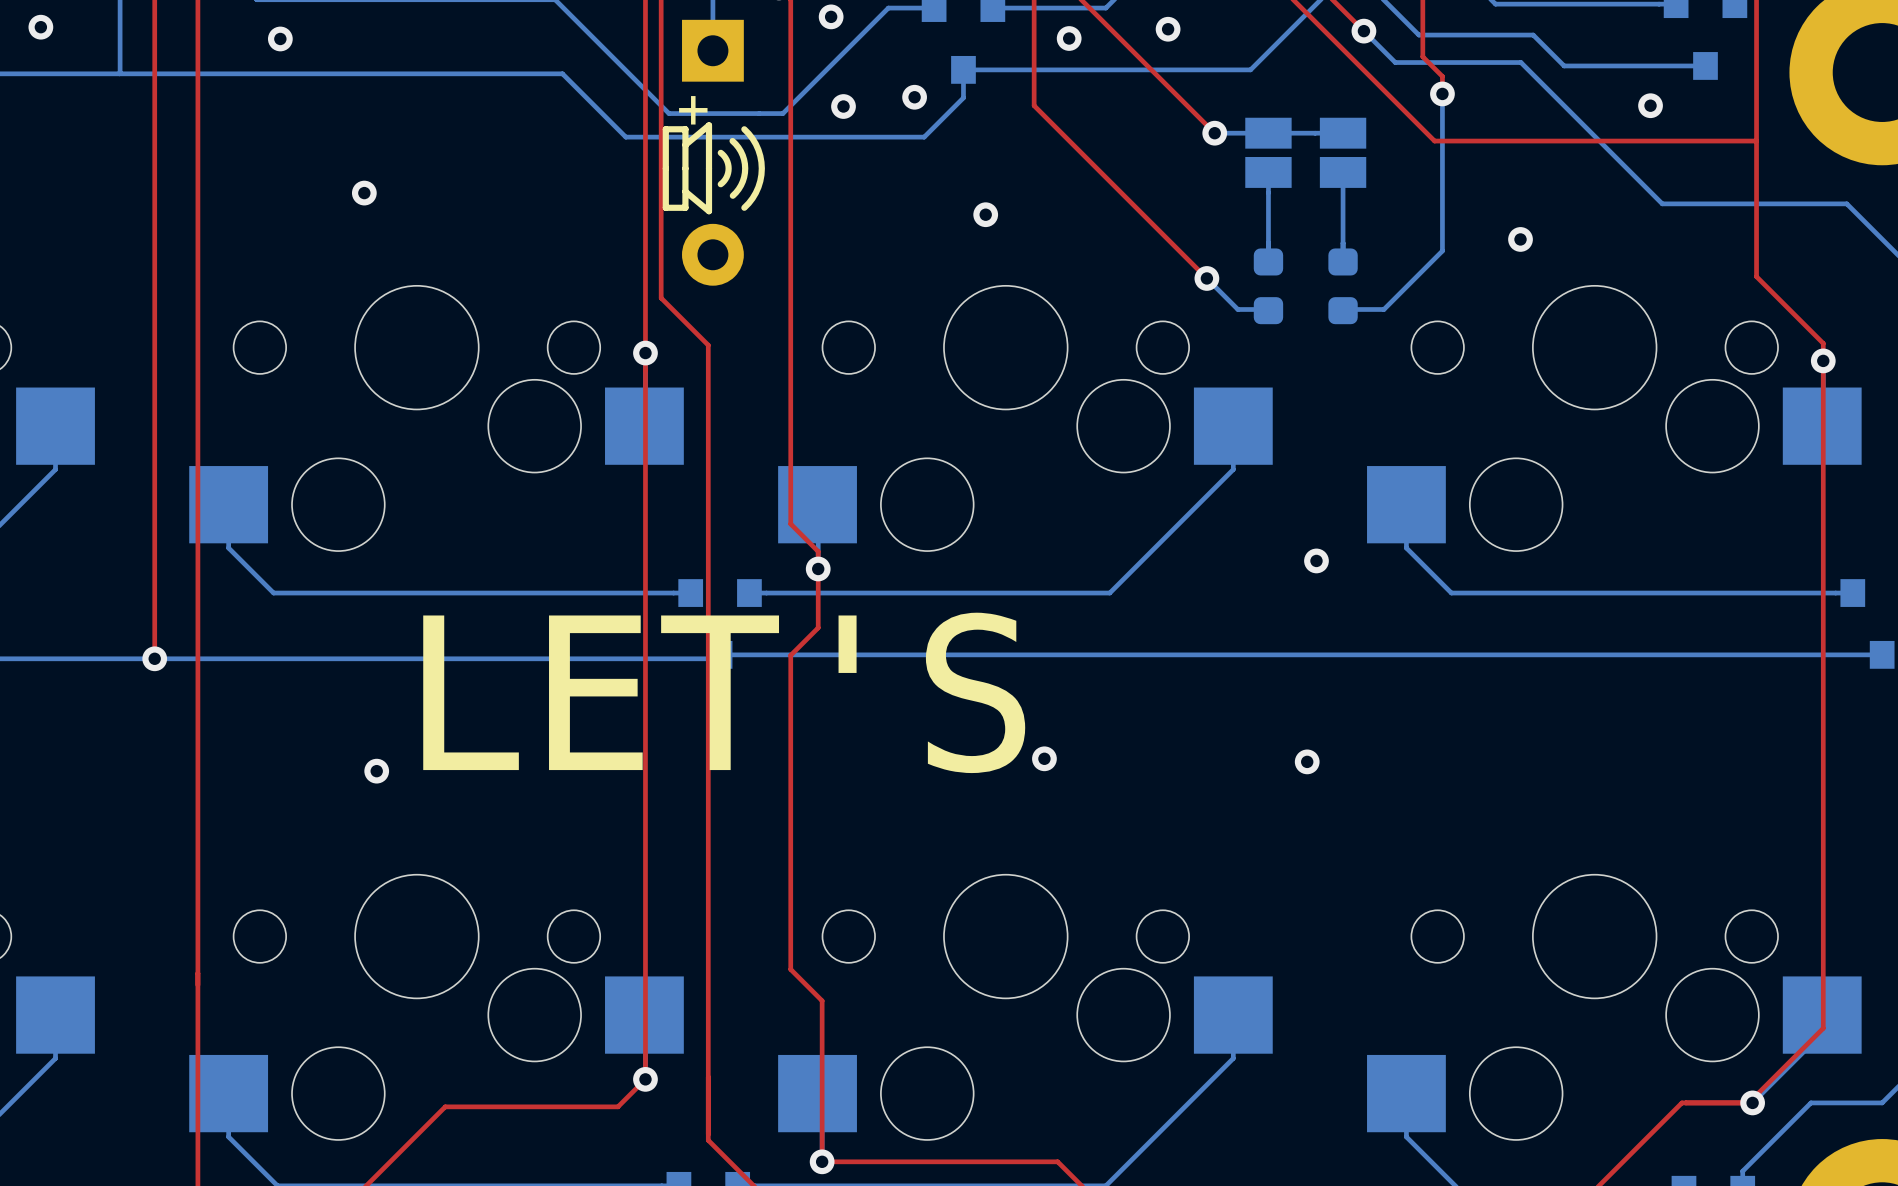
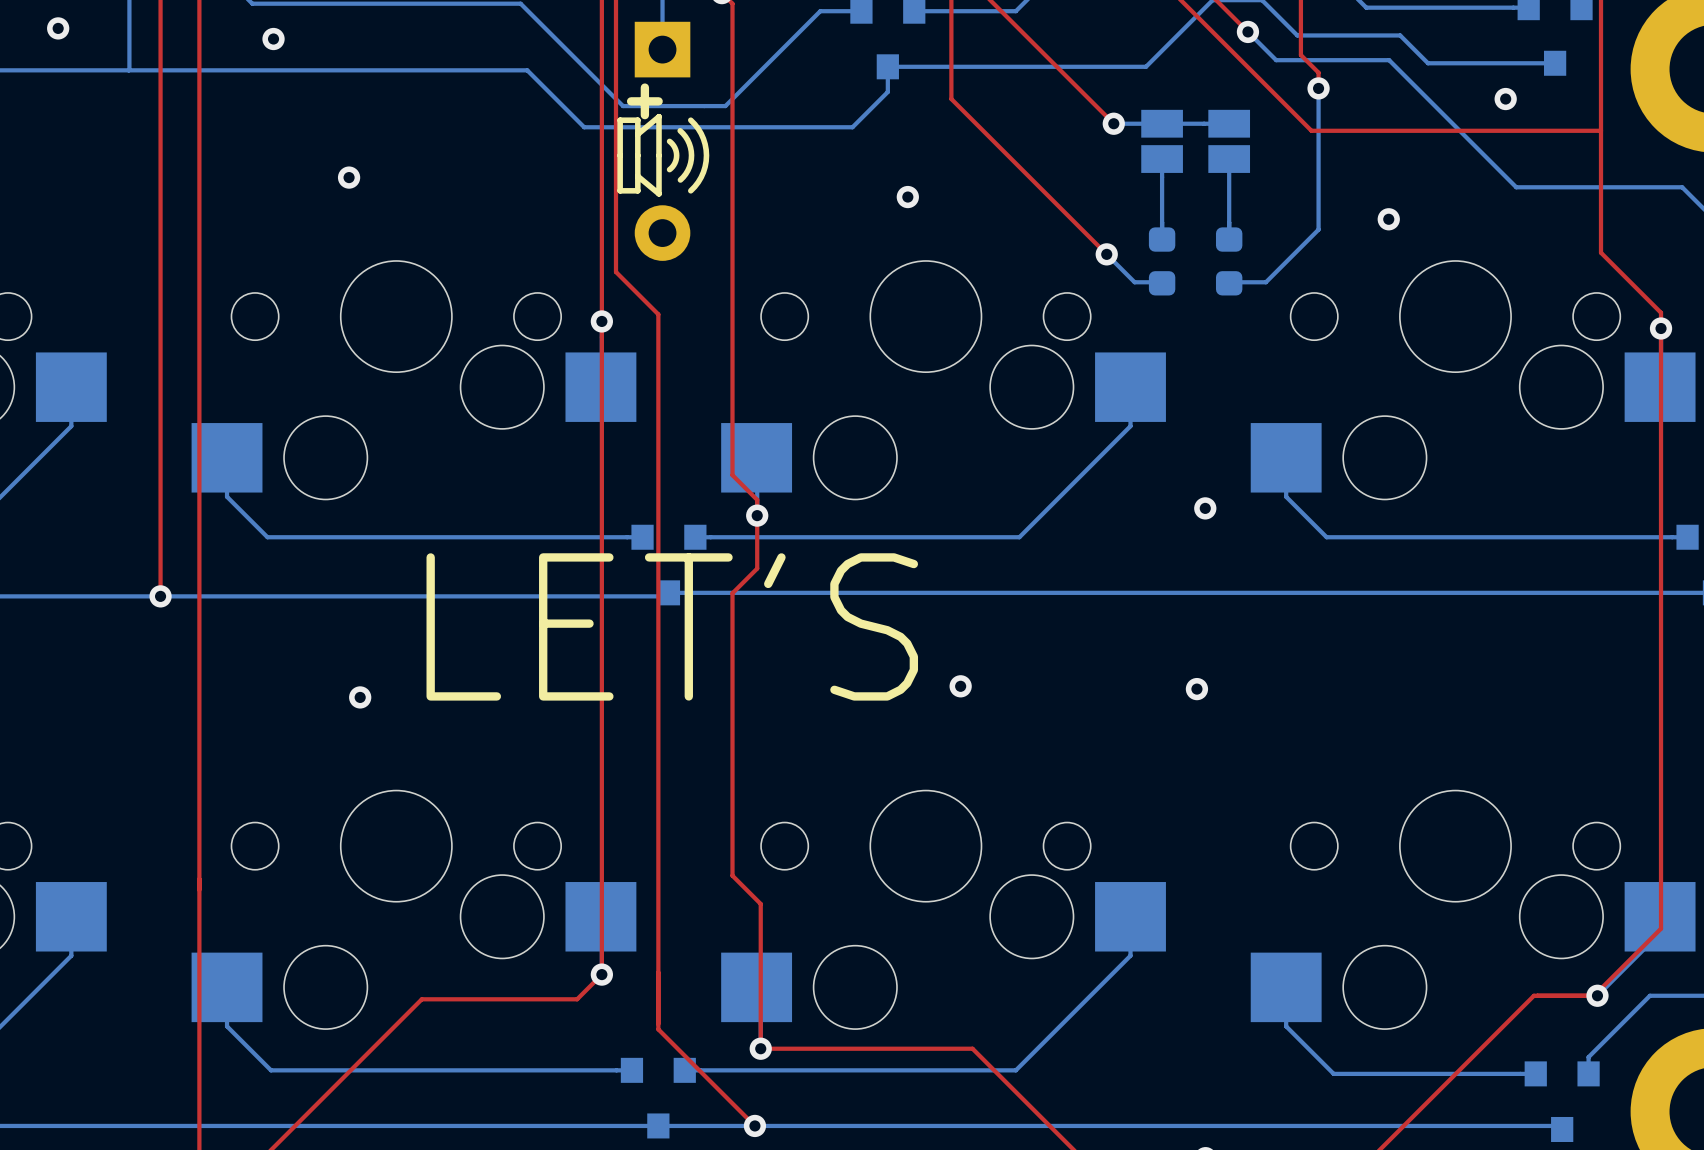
via: (831, 16) -> none
via: (1168, 29) -> none
via: (1069, 38) -> none
via: (914, 97) -> none
via: (843, 106) -> none

